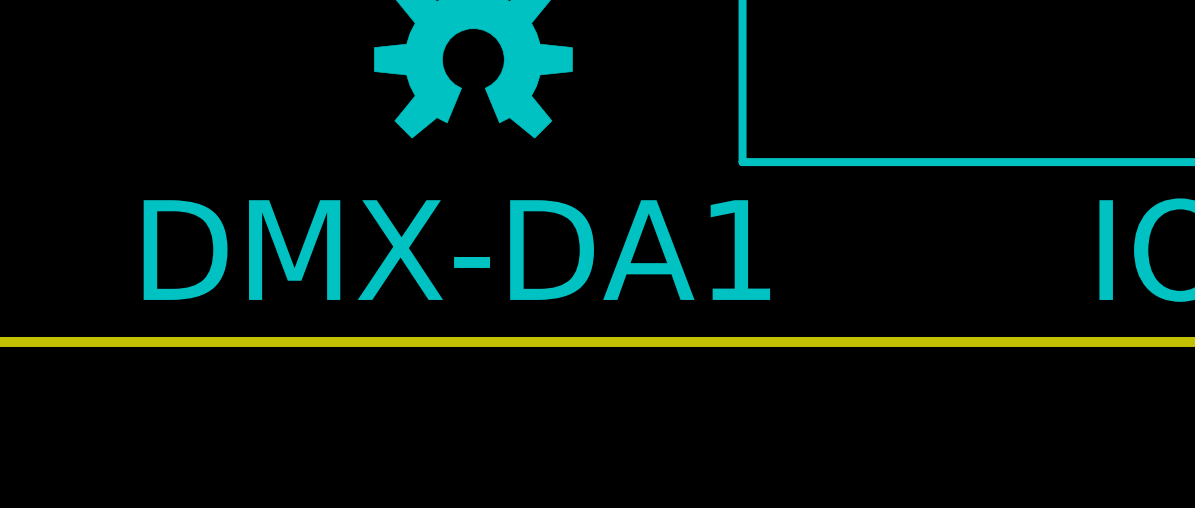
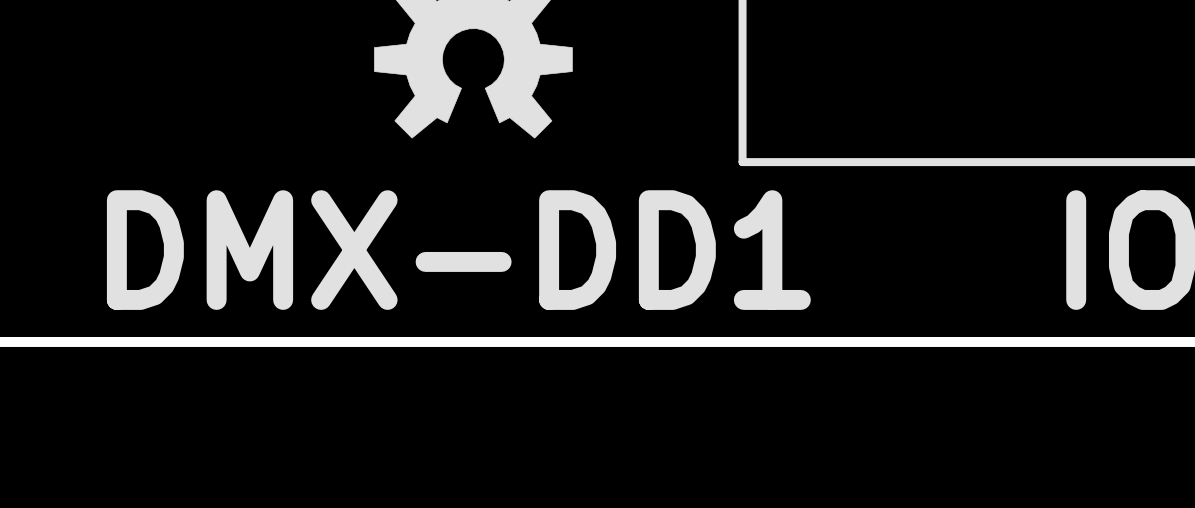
text: DMX-DA1 (456, 250) -> DMX-DD1 (458, 250)

